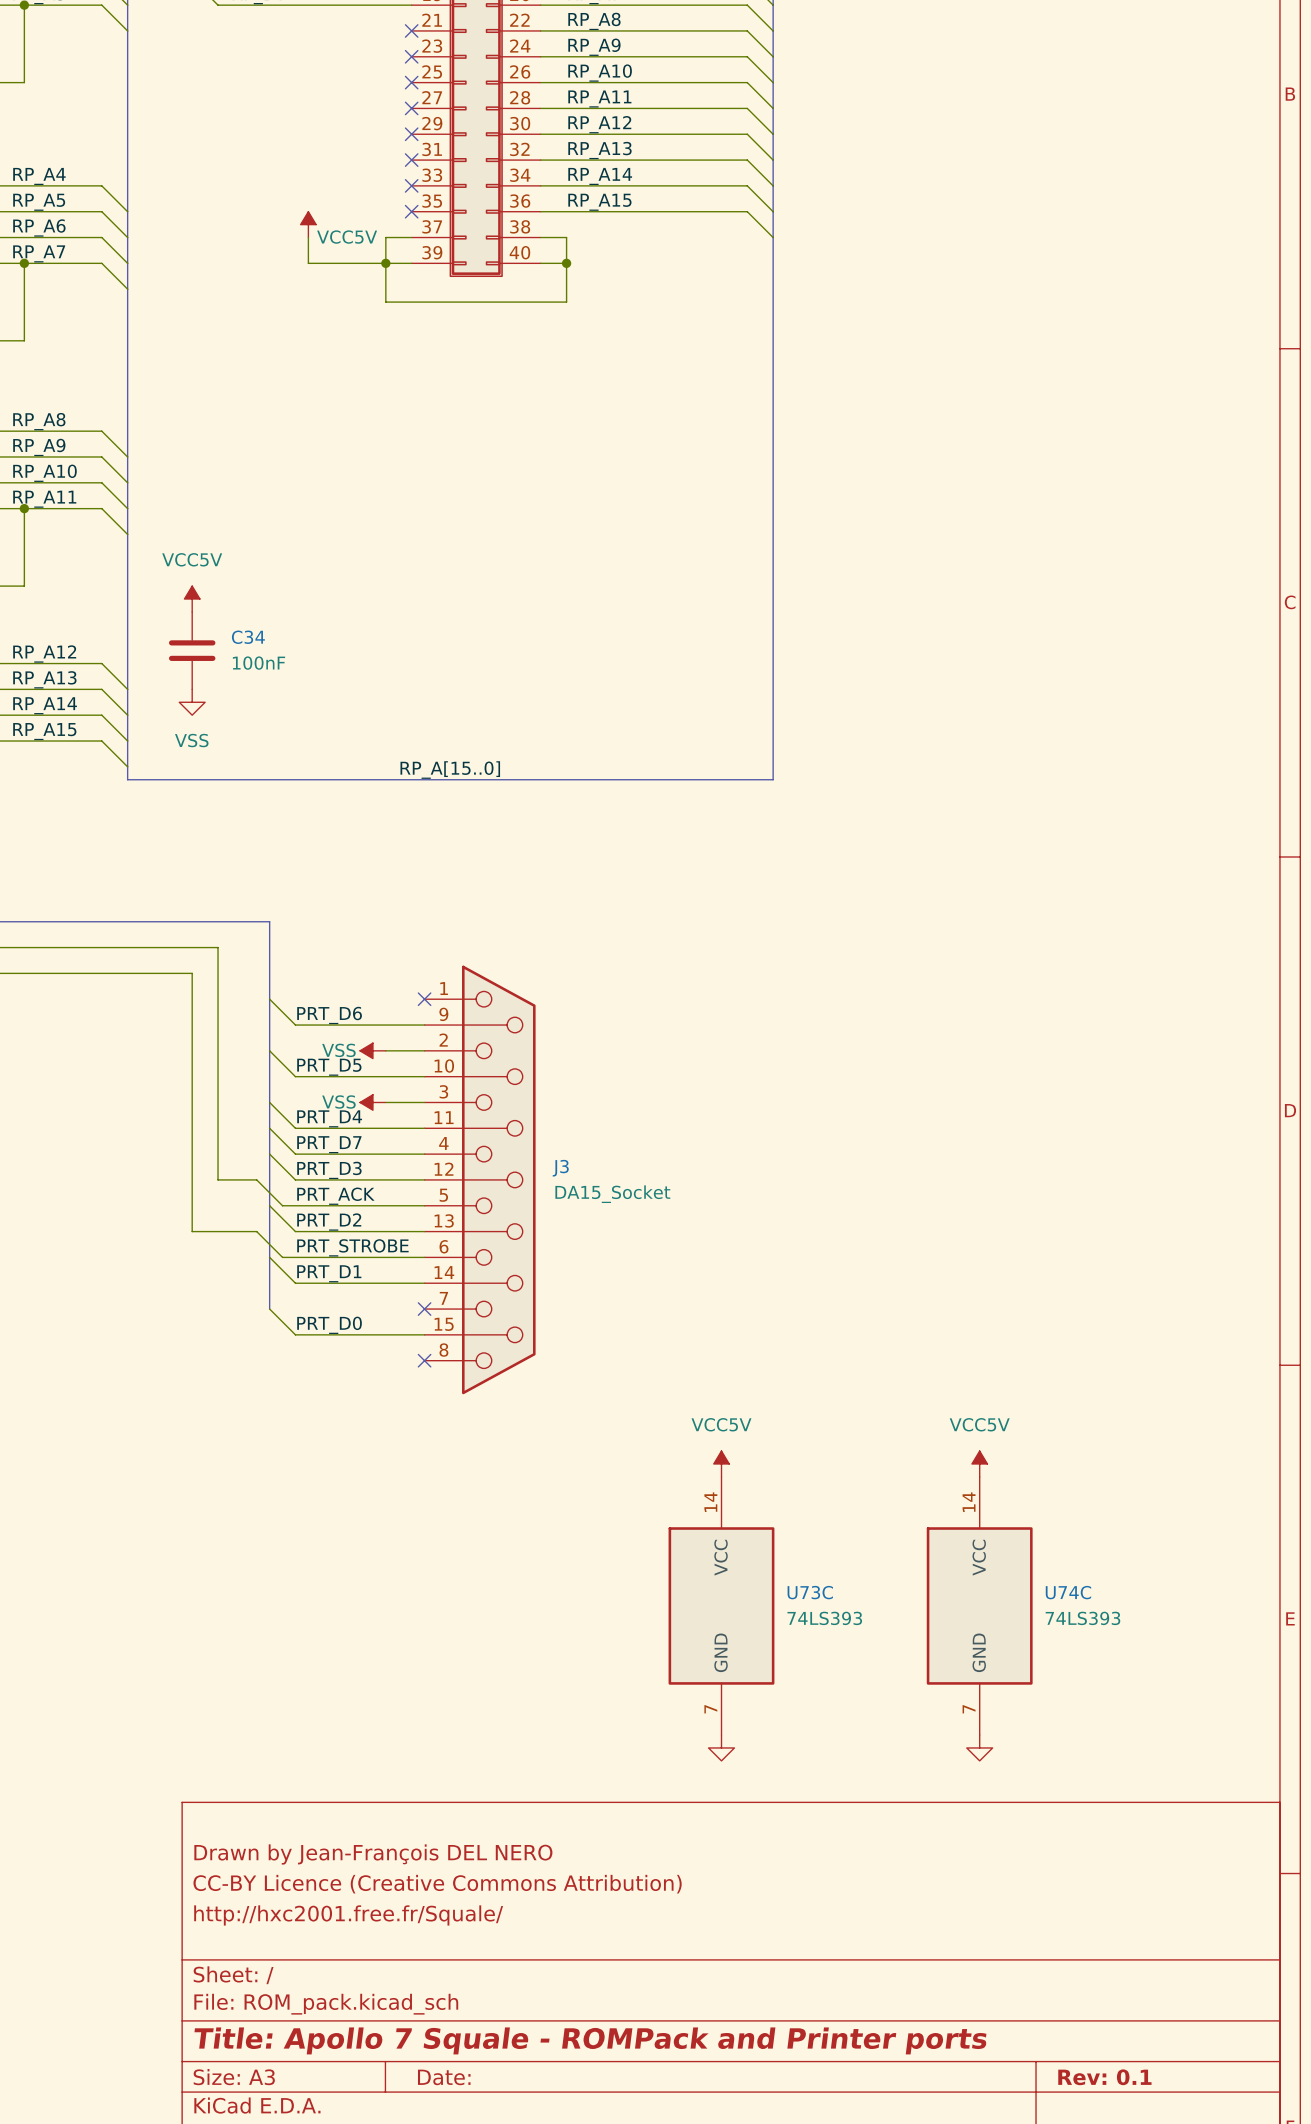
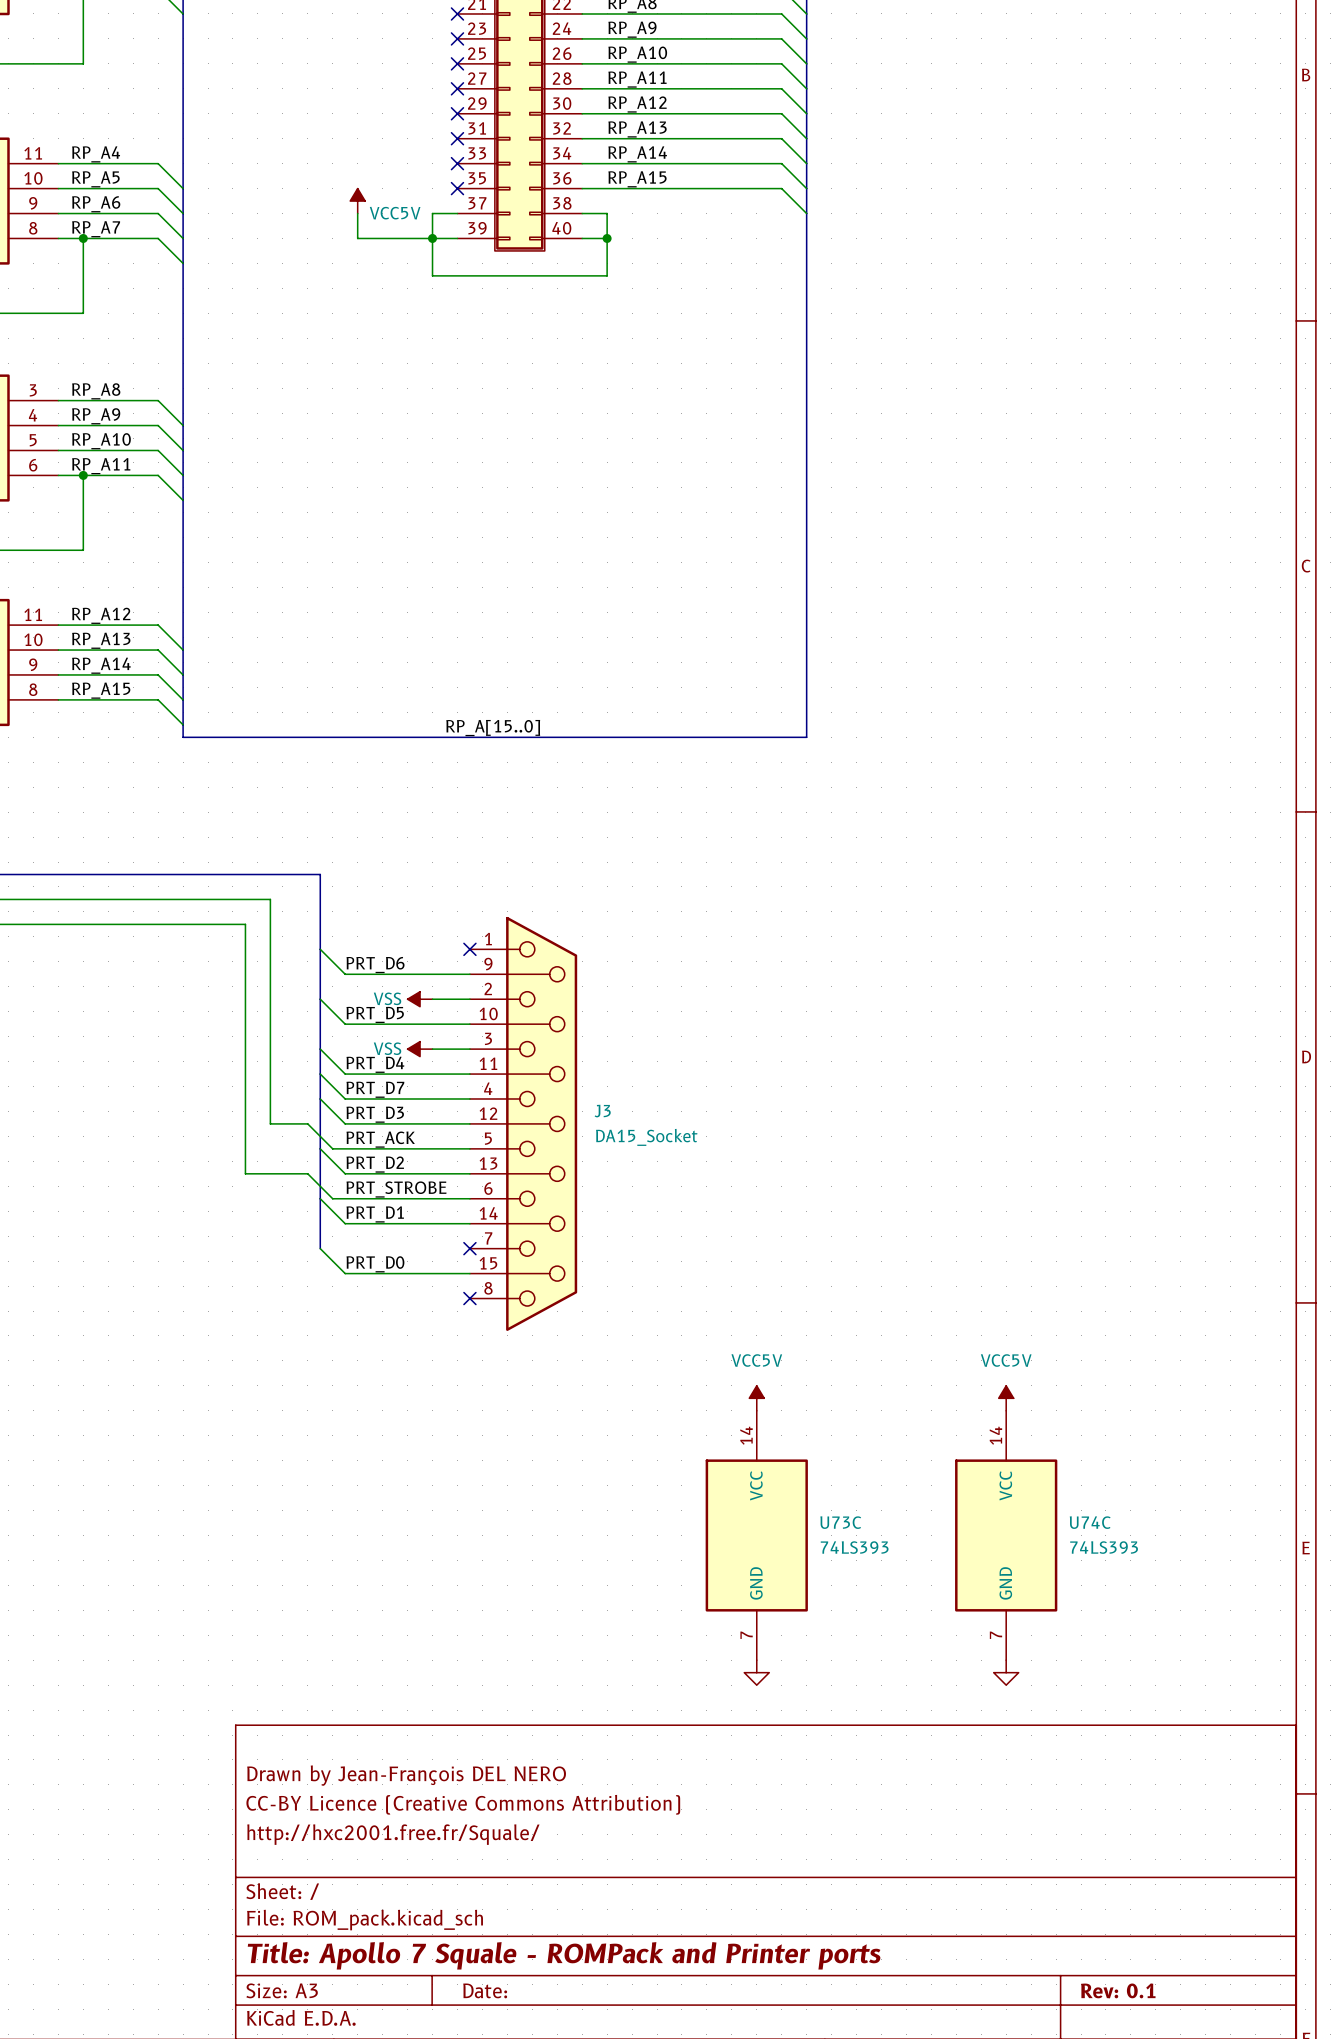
power symbol: VCC5V (192, 599) -> none
C34: 100nF (192, 650) -> none
power symbol: VSS (192, 702) -> none

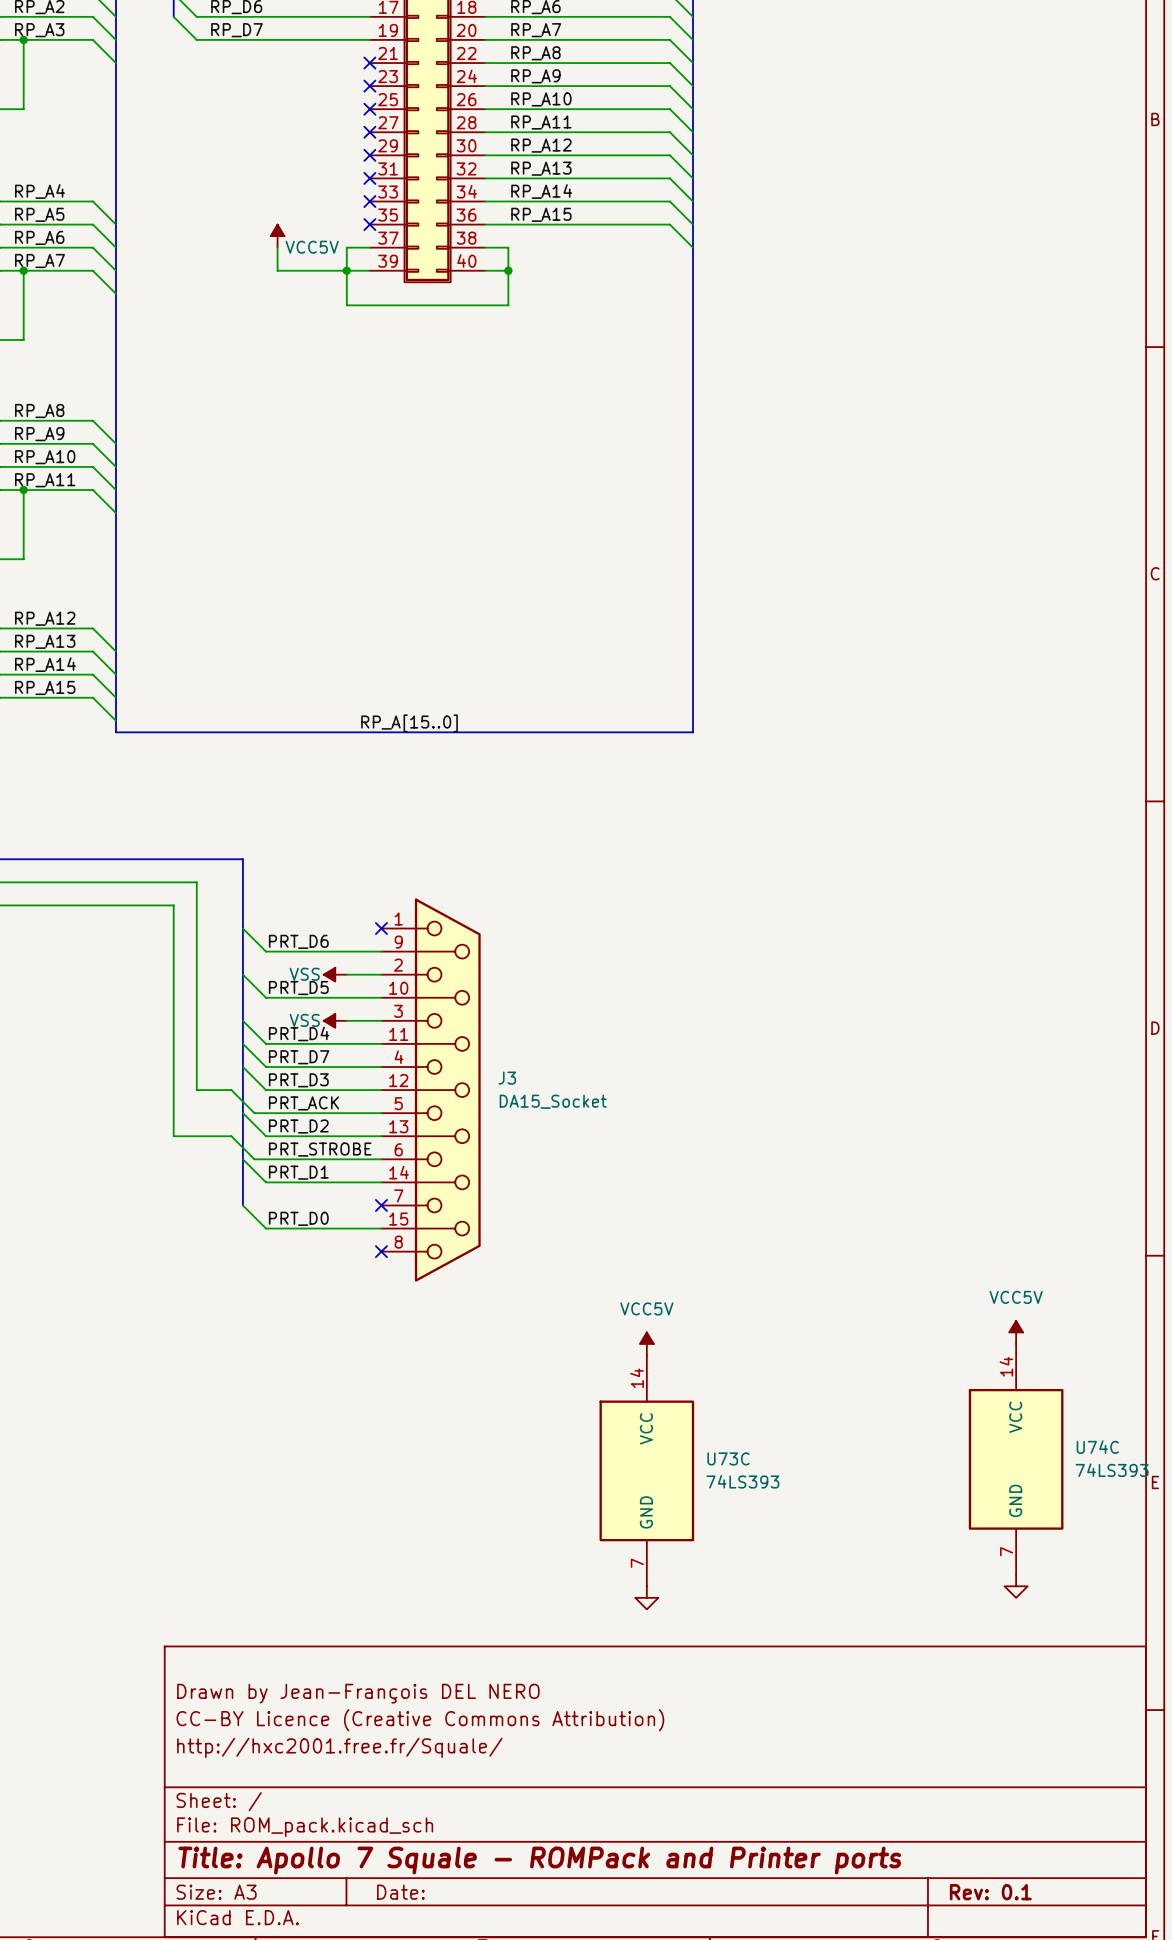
power symbol position: VCC5V (1006, 1398) -> VCC5V (1016, 1332)
U74C position: (1006, 1535) -> (1016, 1459)
power symbol position: (1006, 1672) -> (1016, 1586)

